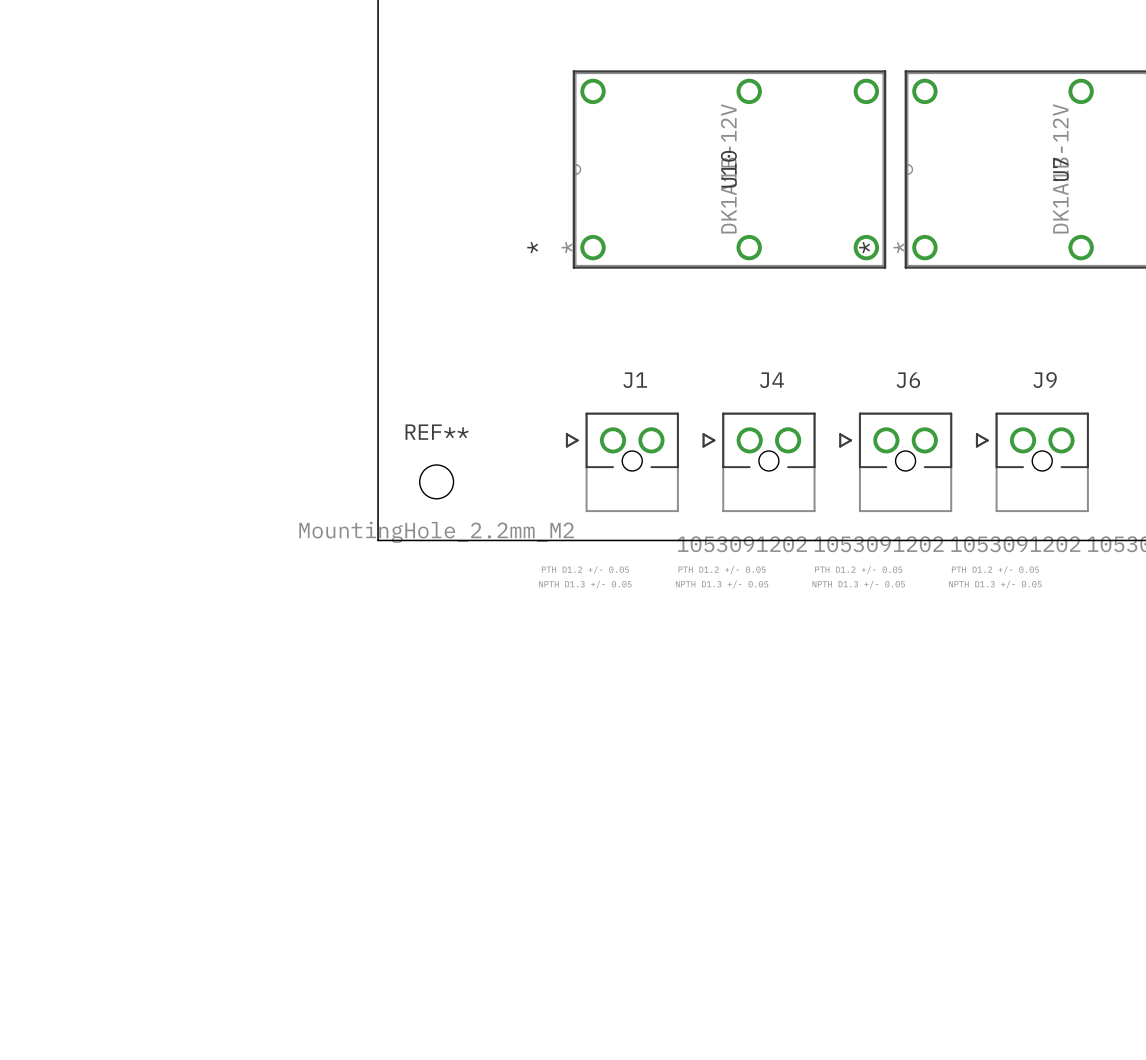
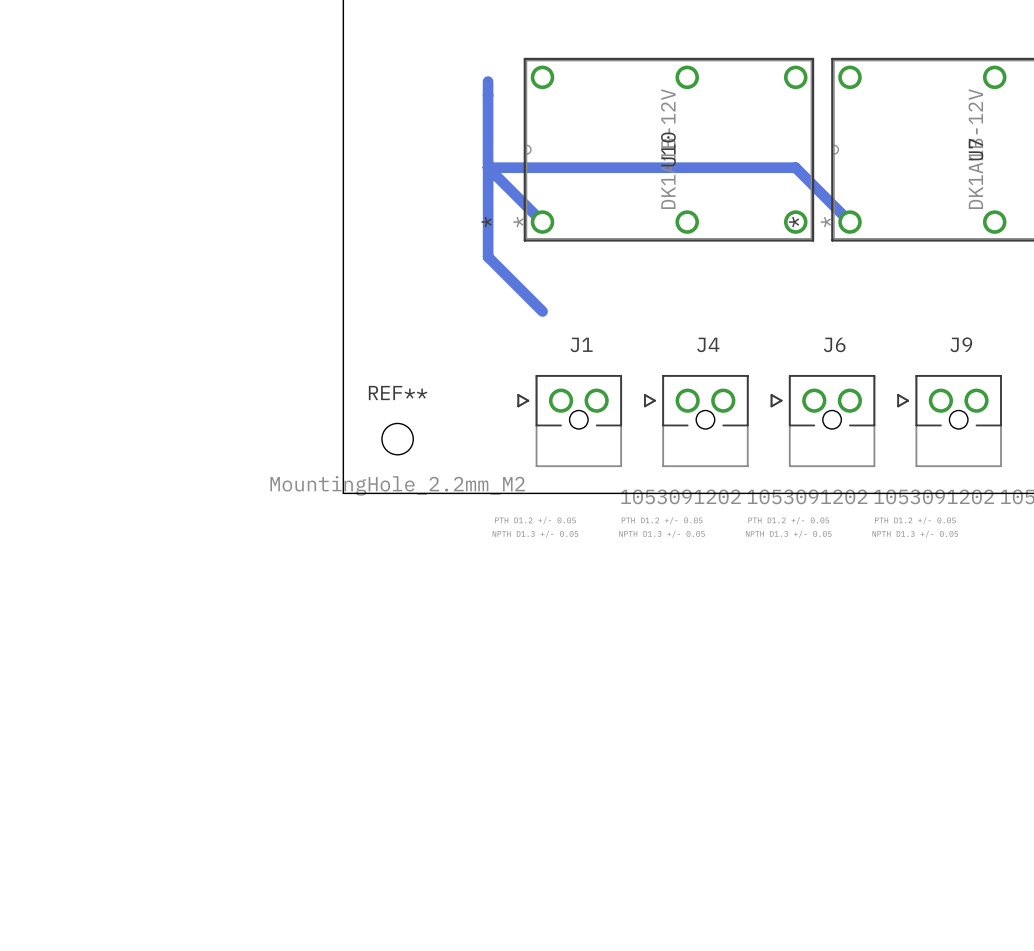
bottom track: none -> (488, 81) (488, 167) (542, 222)
bottom track: none -> (850, 222) (795, 167) (488, 167) (488, 257) (542, 311)

